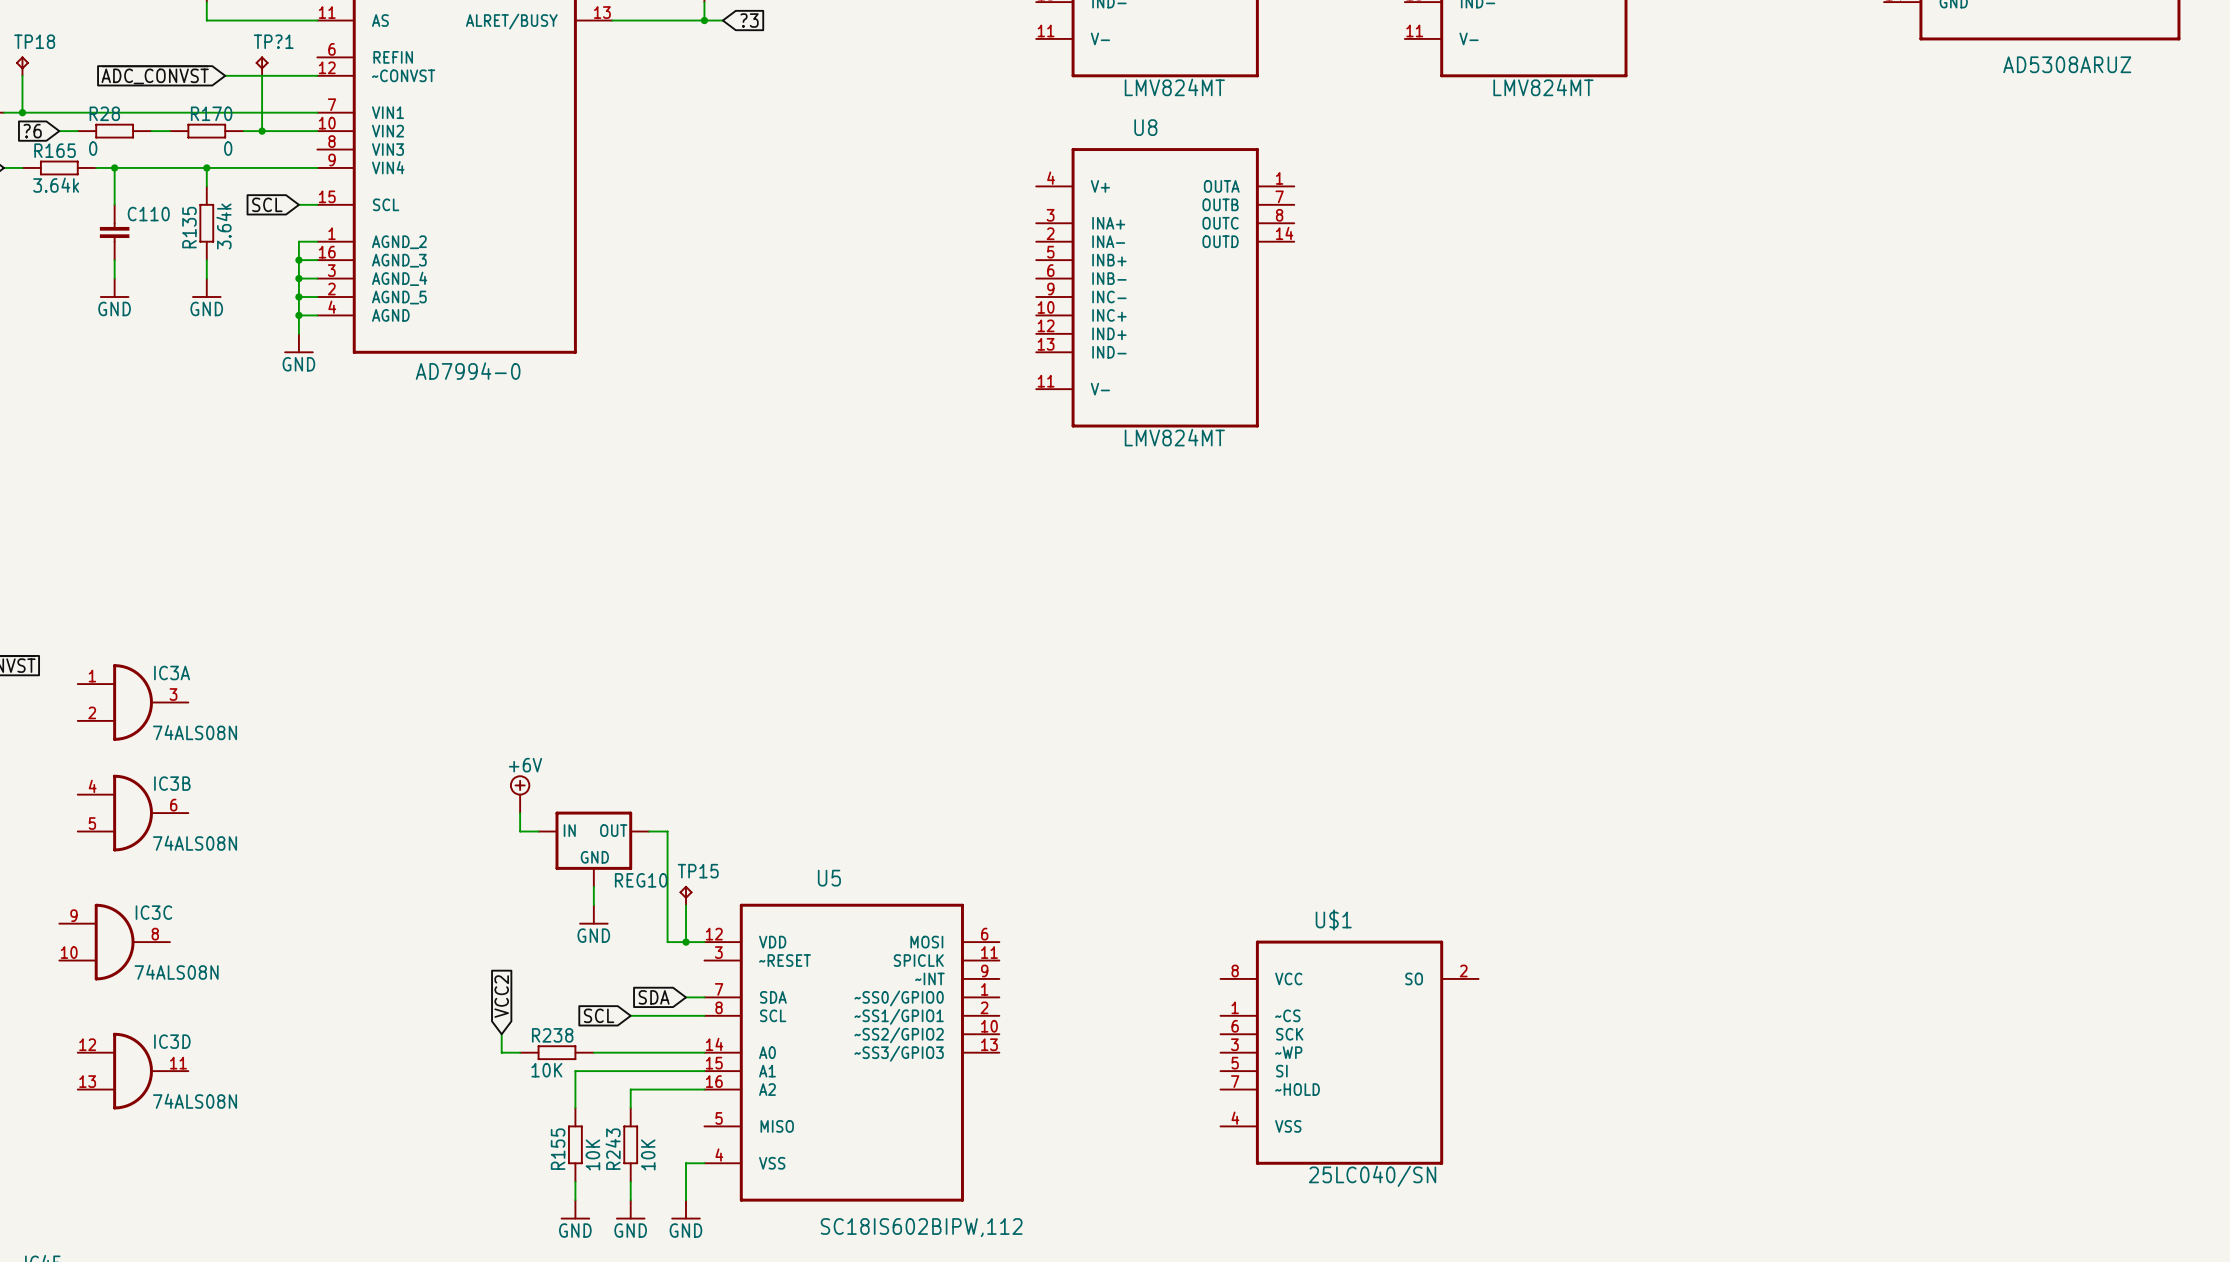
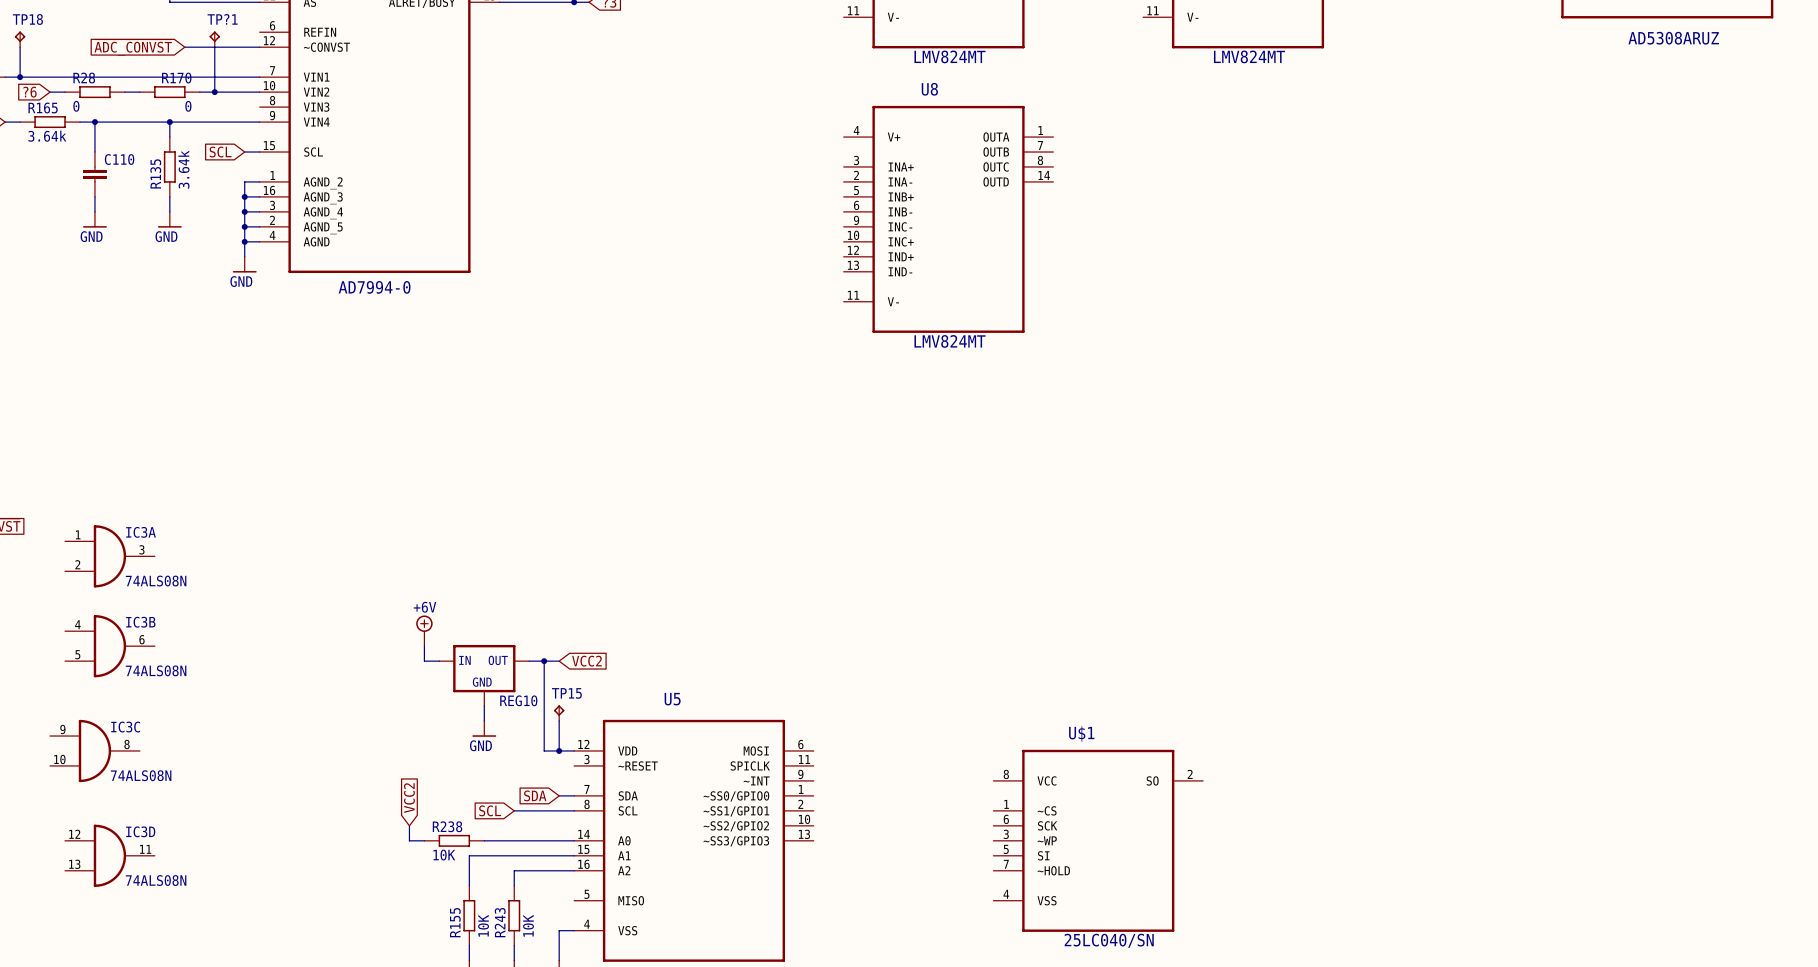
wire: none -> (544, 661) (559, 661)
junction: none -> (544, 661)
global label: none -> VCC2 (586, 661)

